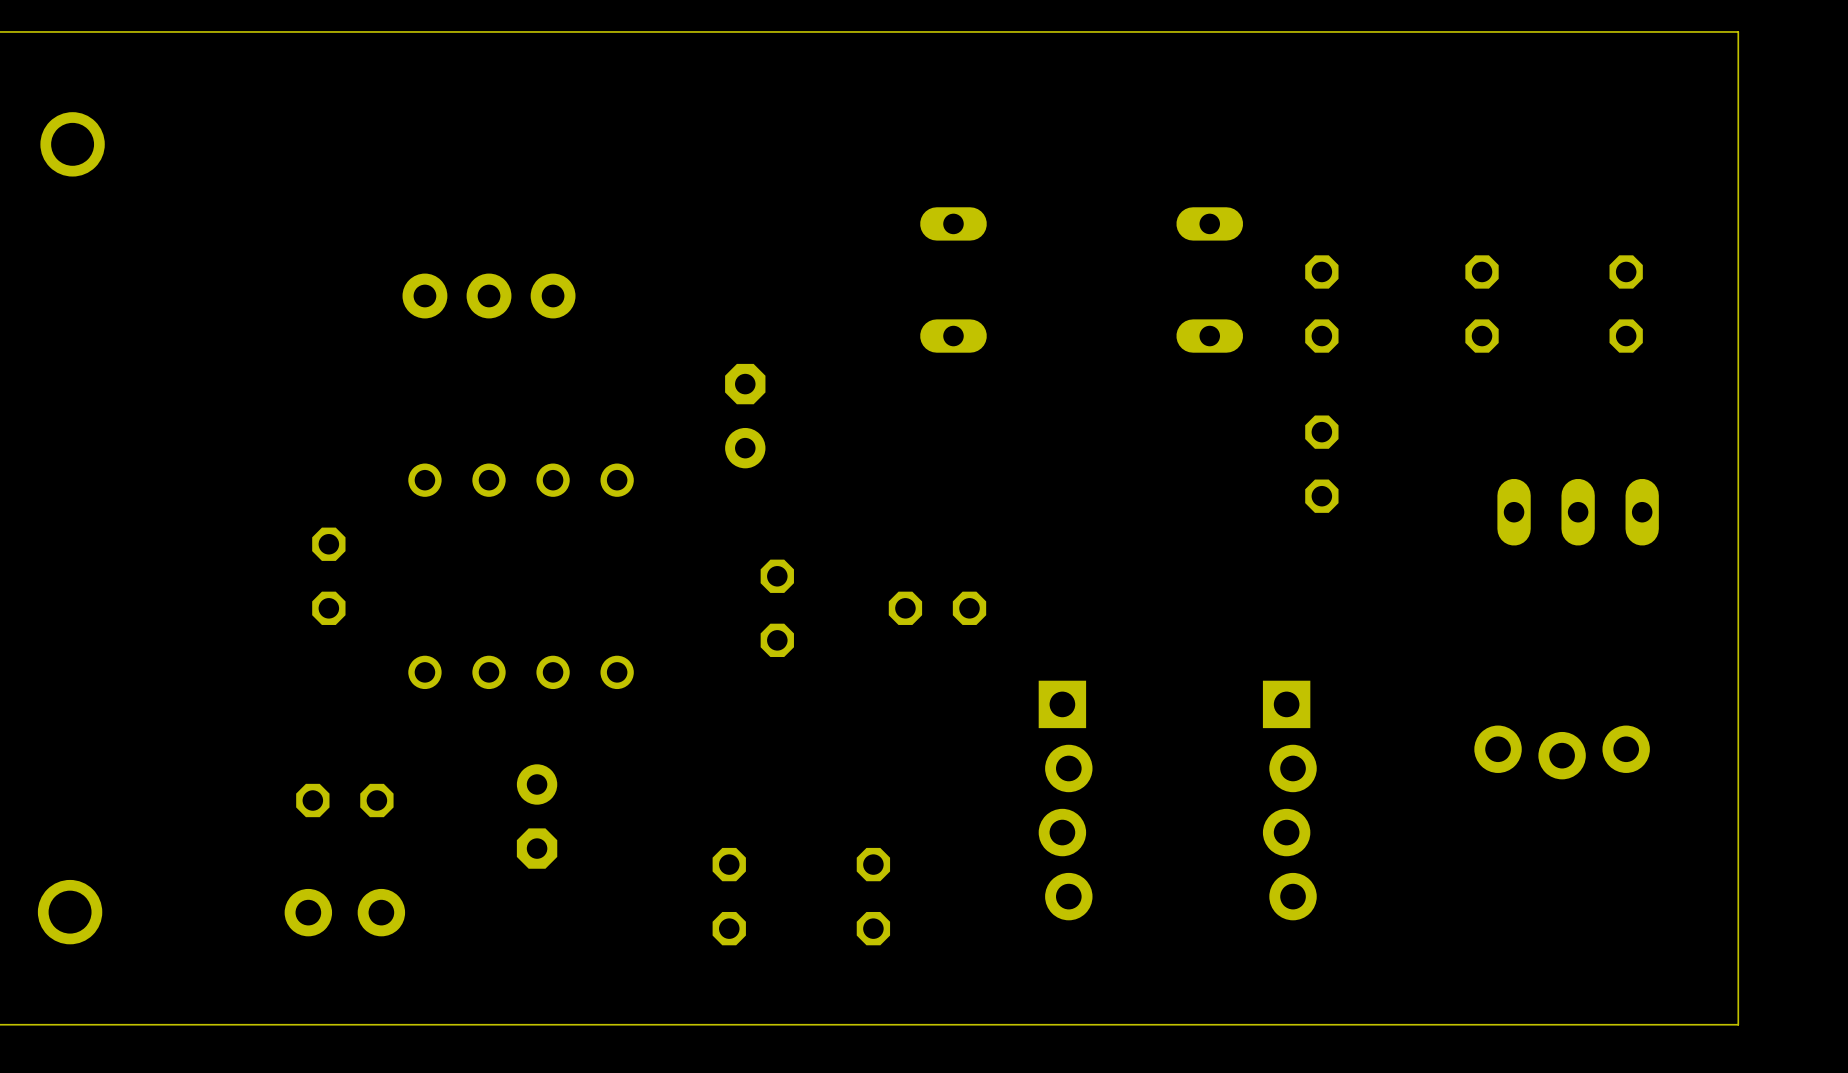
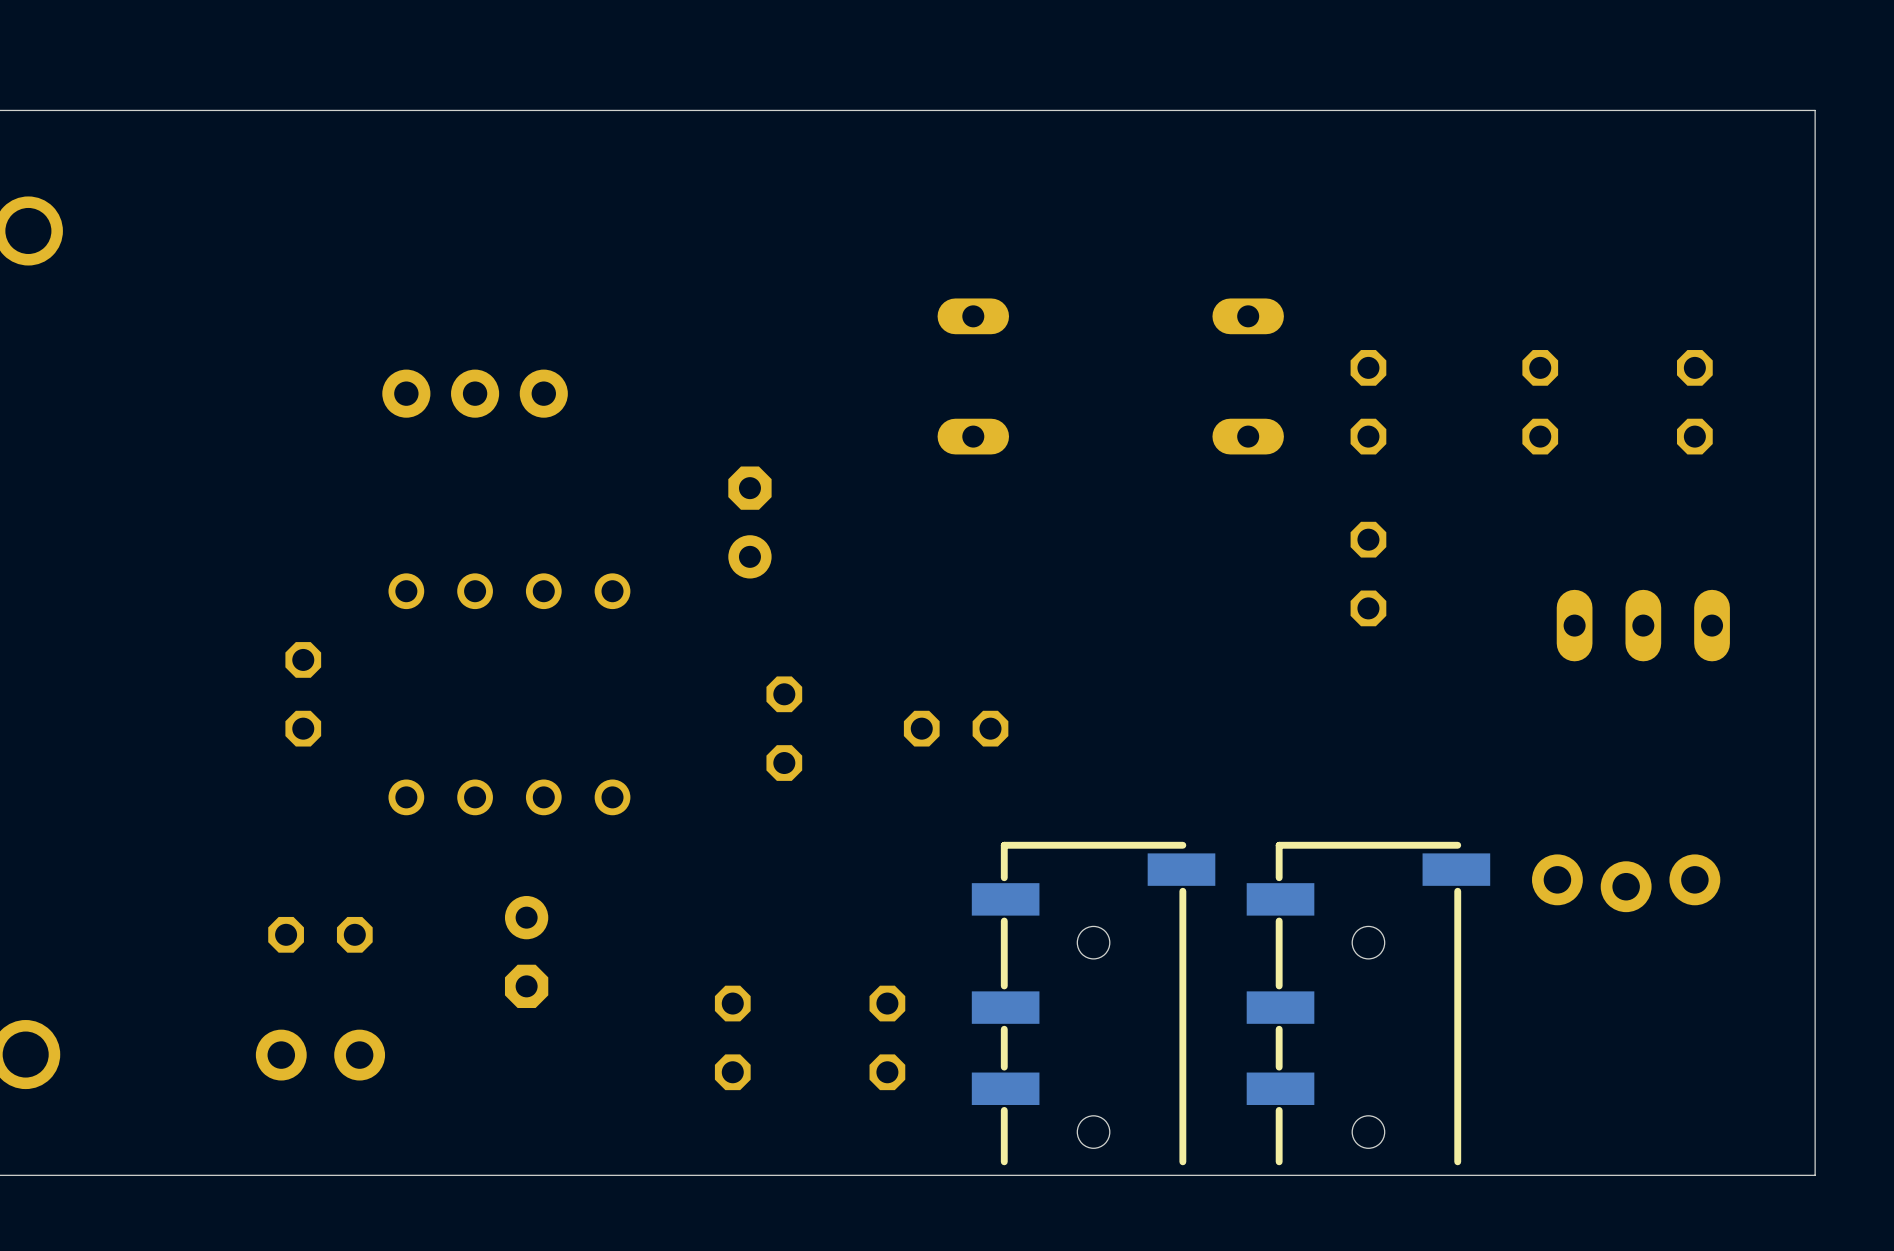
part: (1065, 800) -> none
part: (1289, 800) -> none
part: none -> (1093, 1003)
part: none -> (1368, 1003)

